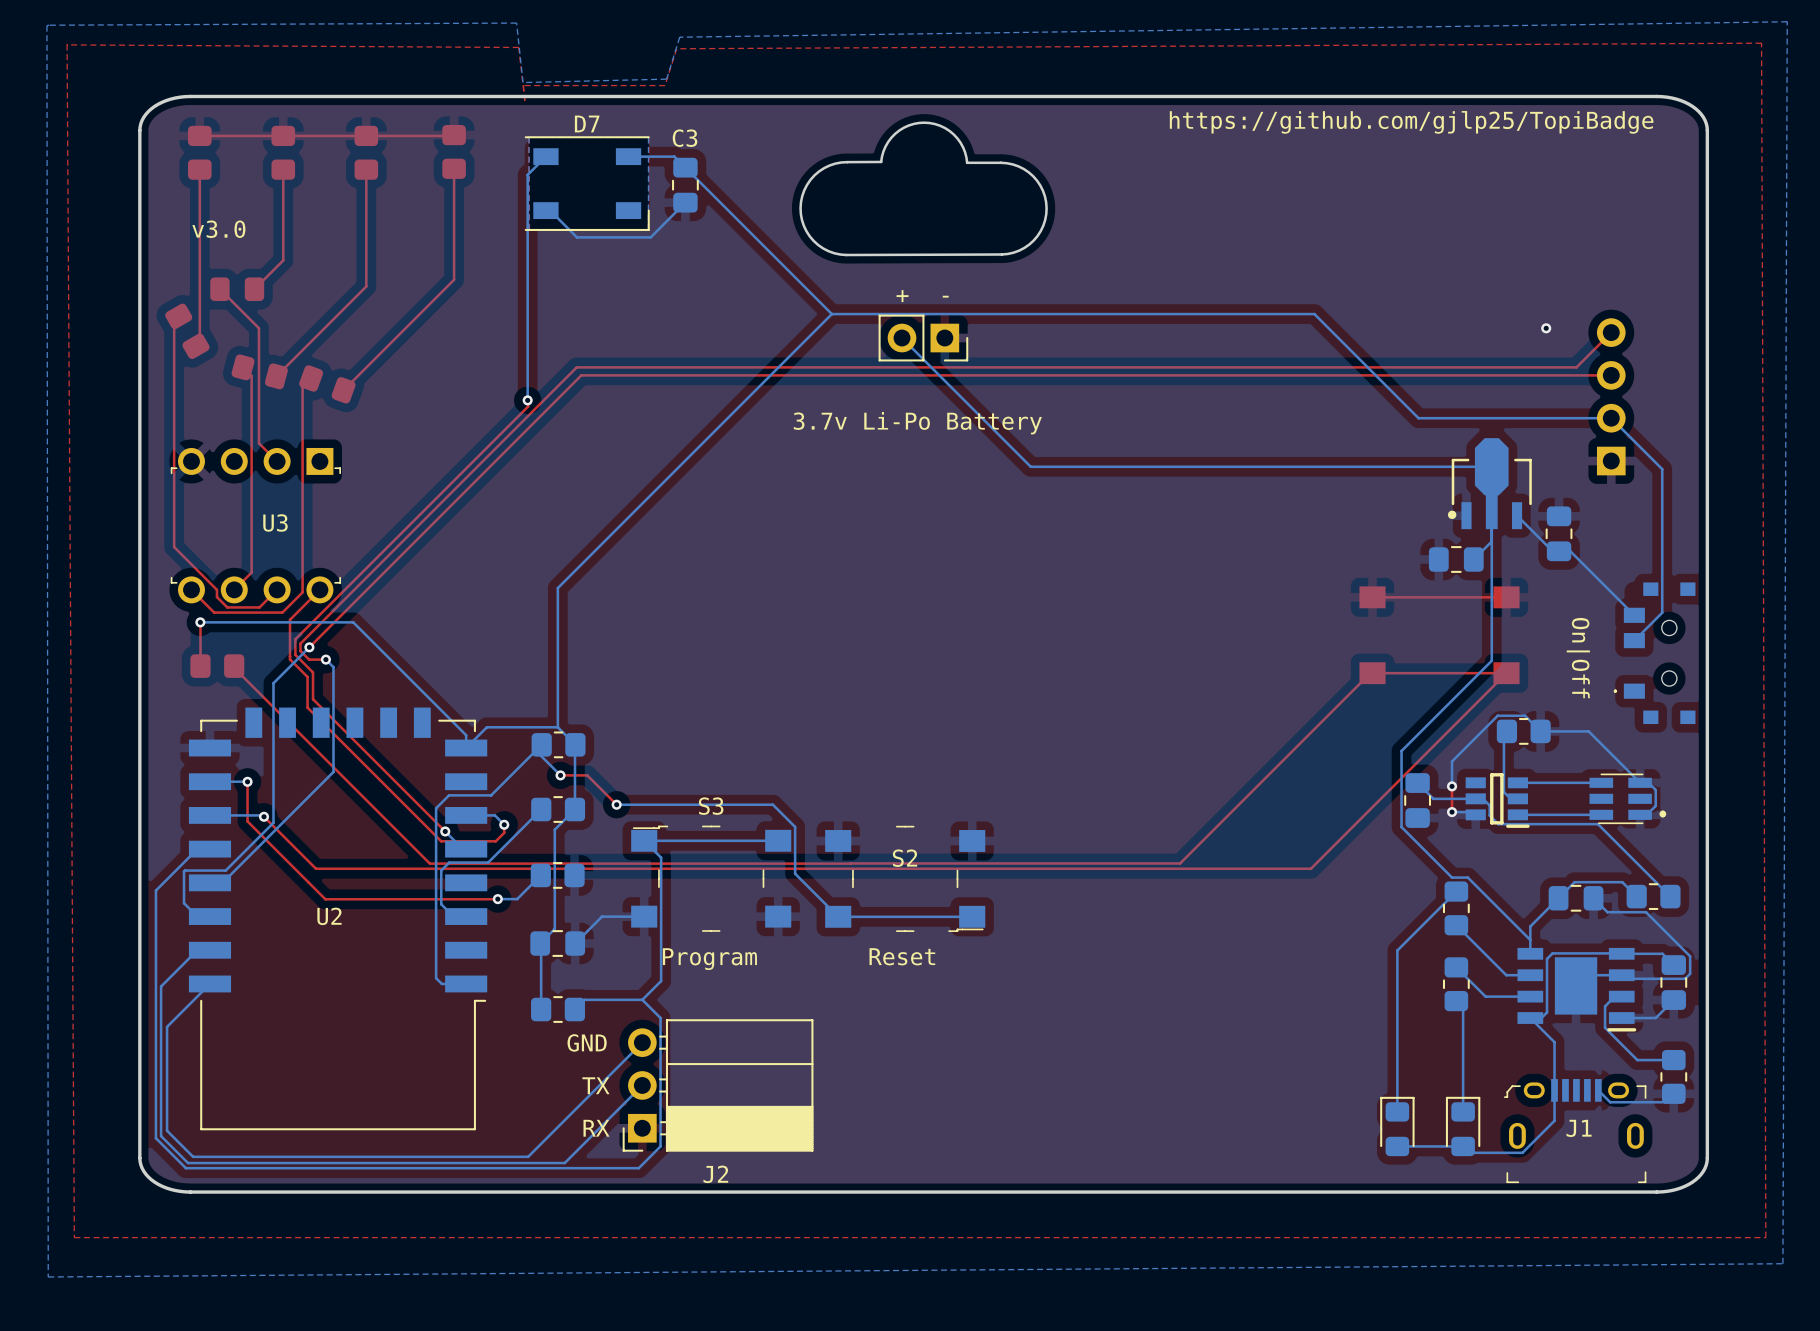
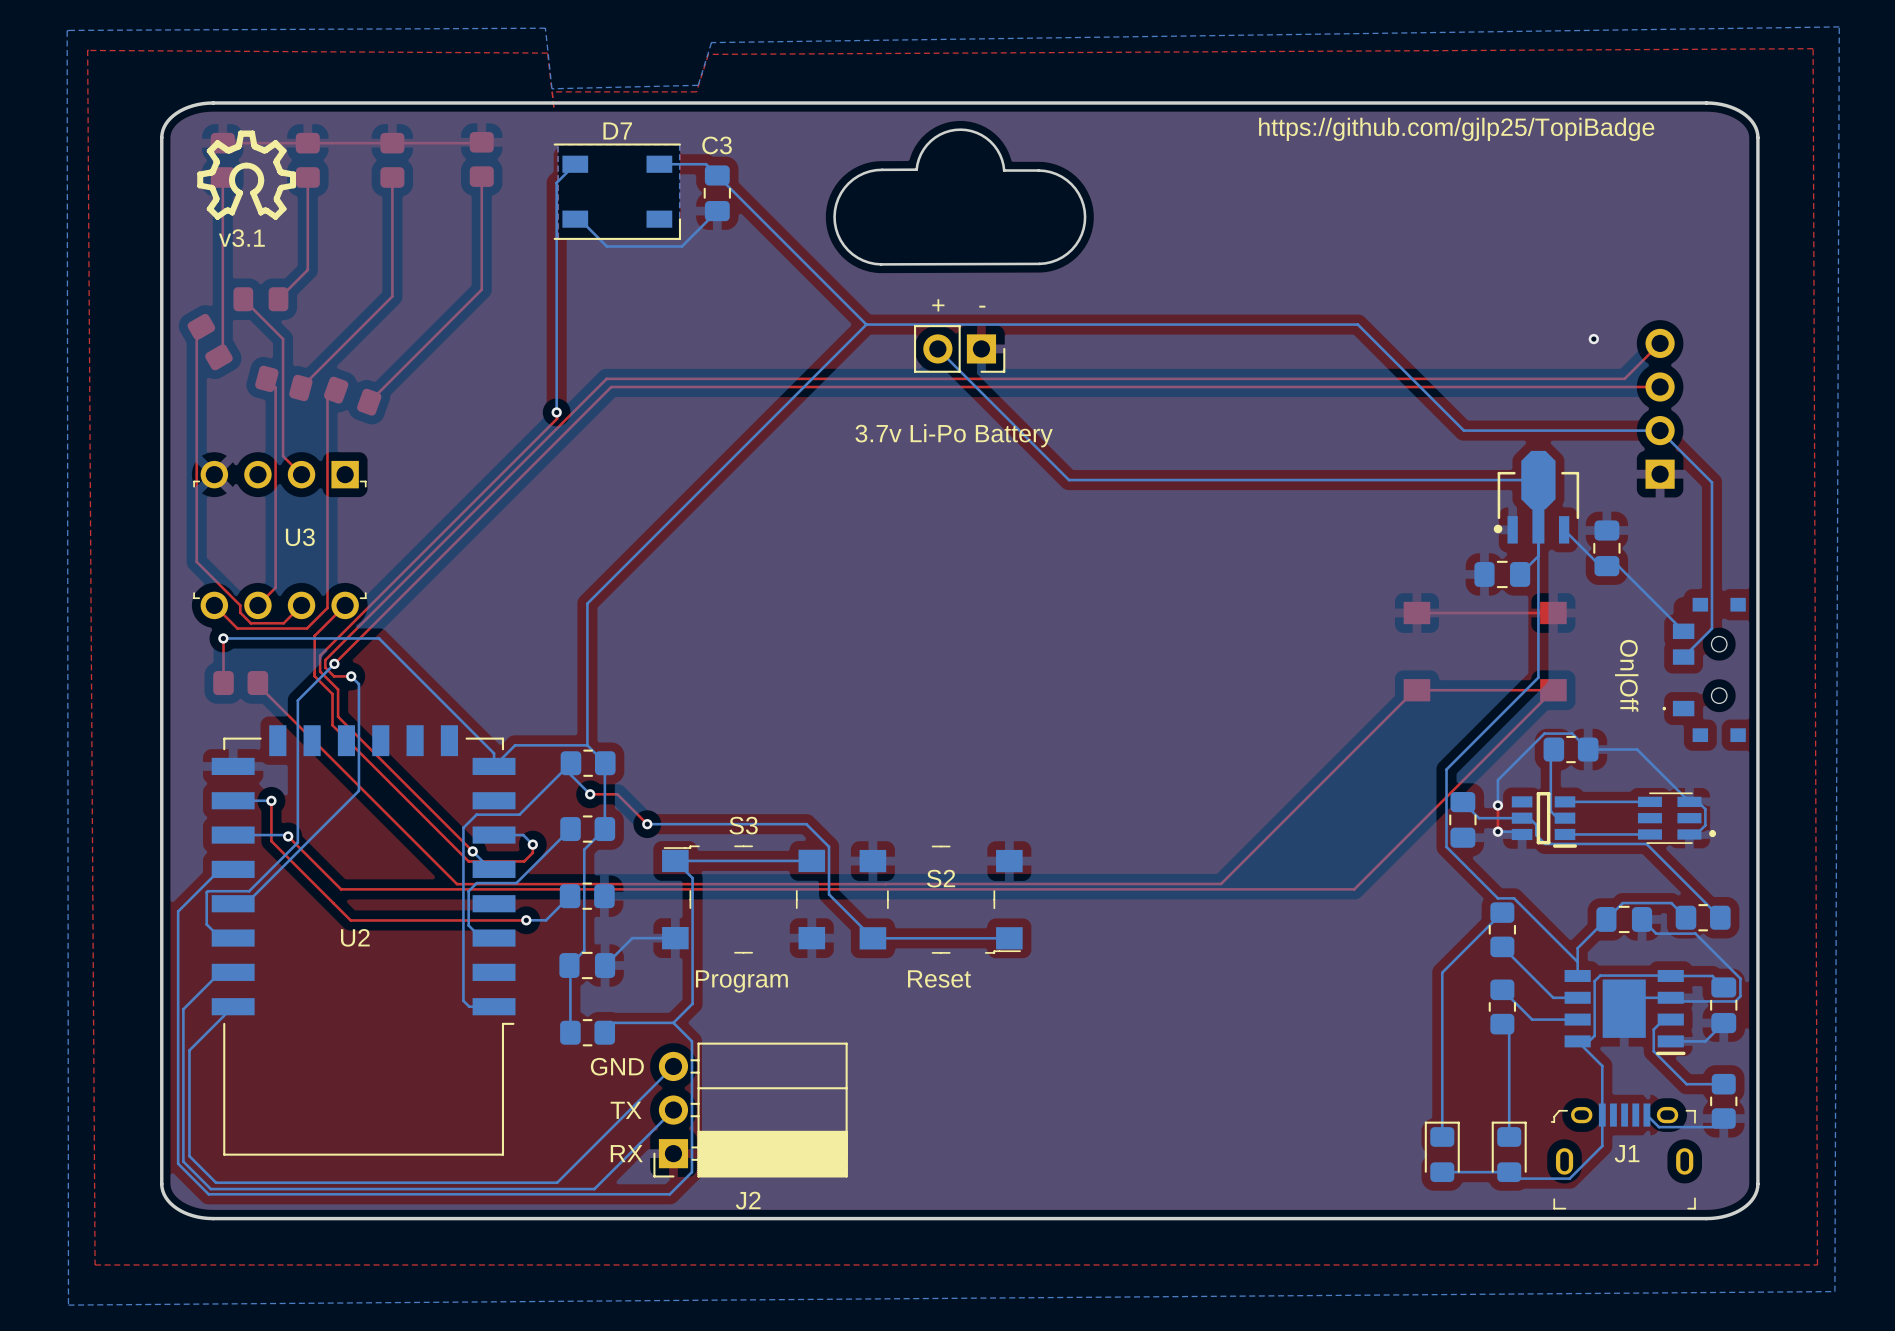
drawing: none -> [197, 130, 296, 220]
text: v3.0 (218, 229) -> v3.1 (241, 238)

